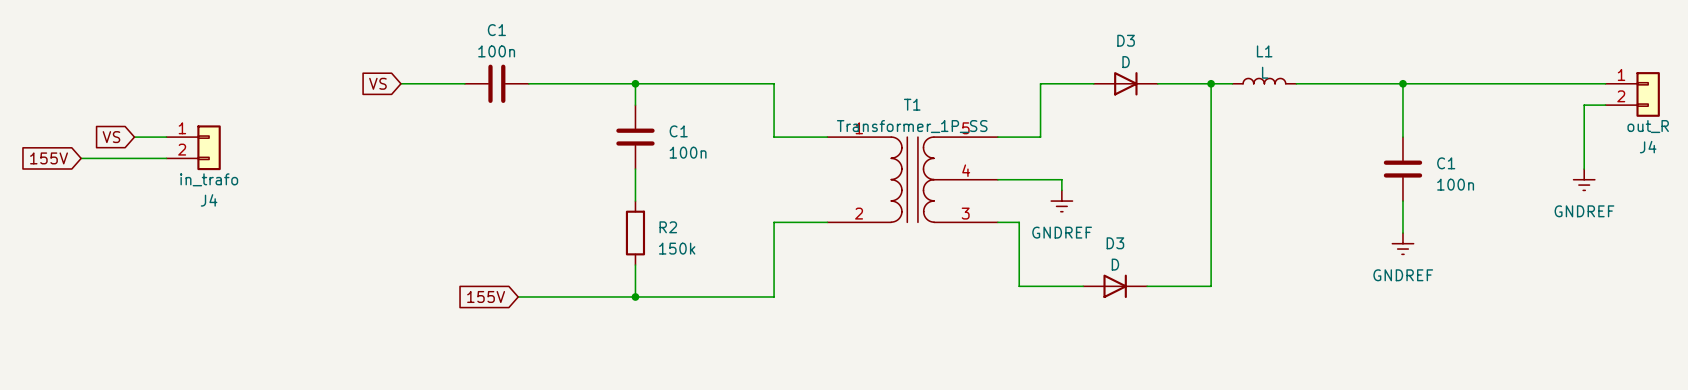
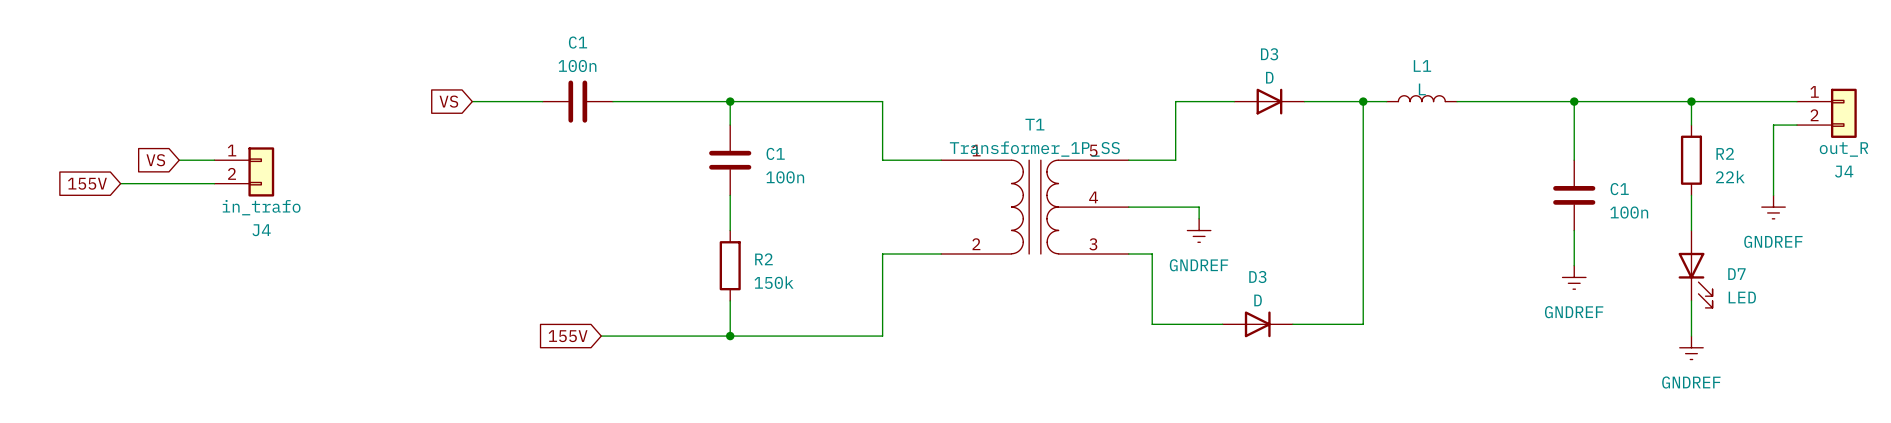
wire: none -> (1691, 101) (1691, 125)
junction: none -> (1691, 101)
R2: none -> 22k (1691, 160)
wire: none -> (1691, 195) (1691, 230)
D7: none -> LED (1695, 269)
wire: none -> (1691, 300) (1691, 336)
power symbol: none -> GNDREF (1691, 347)

